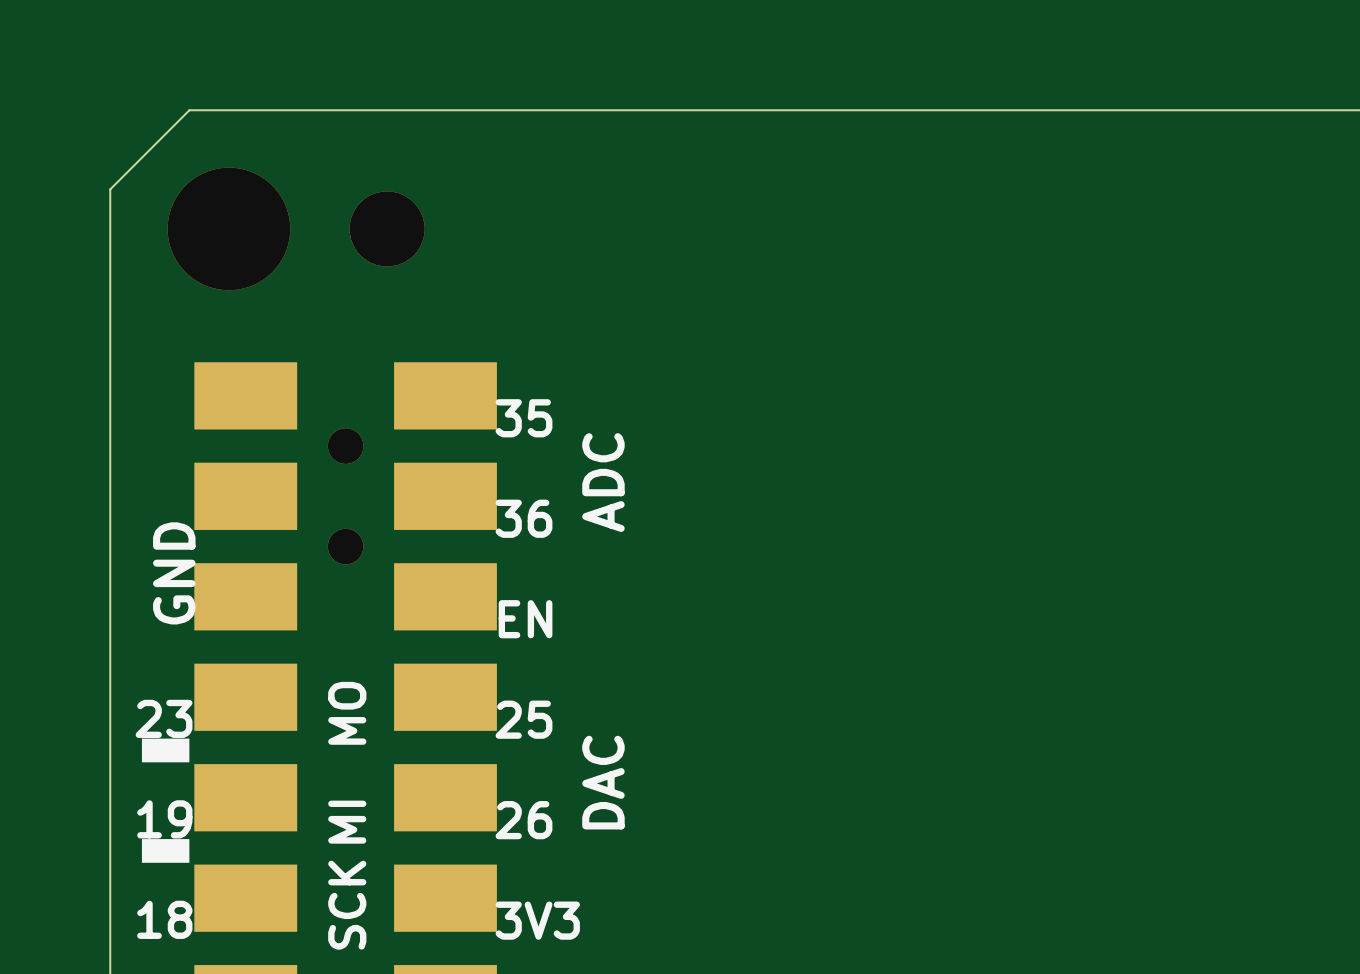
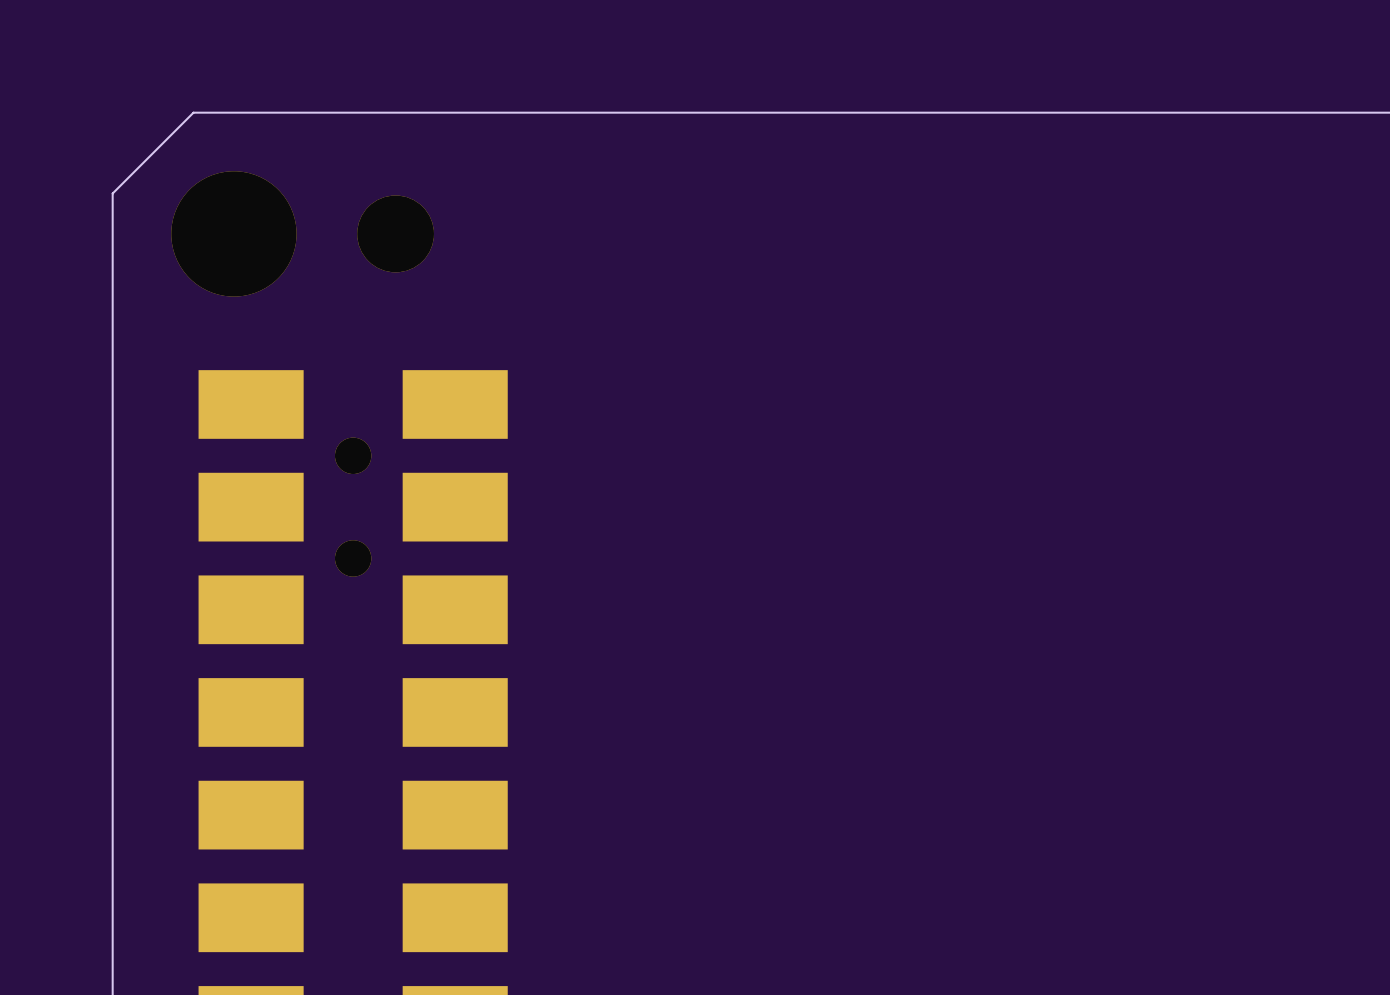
text: 35 (524, 418) -> none
text: ADC (603, 482) -> none
text: 36 (524, 518) -> none
text: GND (174, 573) -> none
text: EN (525, 619) -> none
text: MO (347, 713) -> none
text: 23 (164, 718) -> none
text: 25 (524, 719) -> none
drawing: [141, 738, 190, 763] -> none
text: DAC (603, 782) -> none
text: 19 (164, 819) -> none
text: 26 (524, 820) -> none
text: MI (347, 822) -> none
drawing: [141, 839, 190, 863] -> none
text: SCK (347, 905) -> none
text: 18 (164, 919) -> none
text: 3V3 (537, 920) -> none

